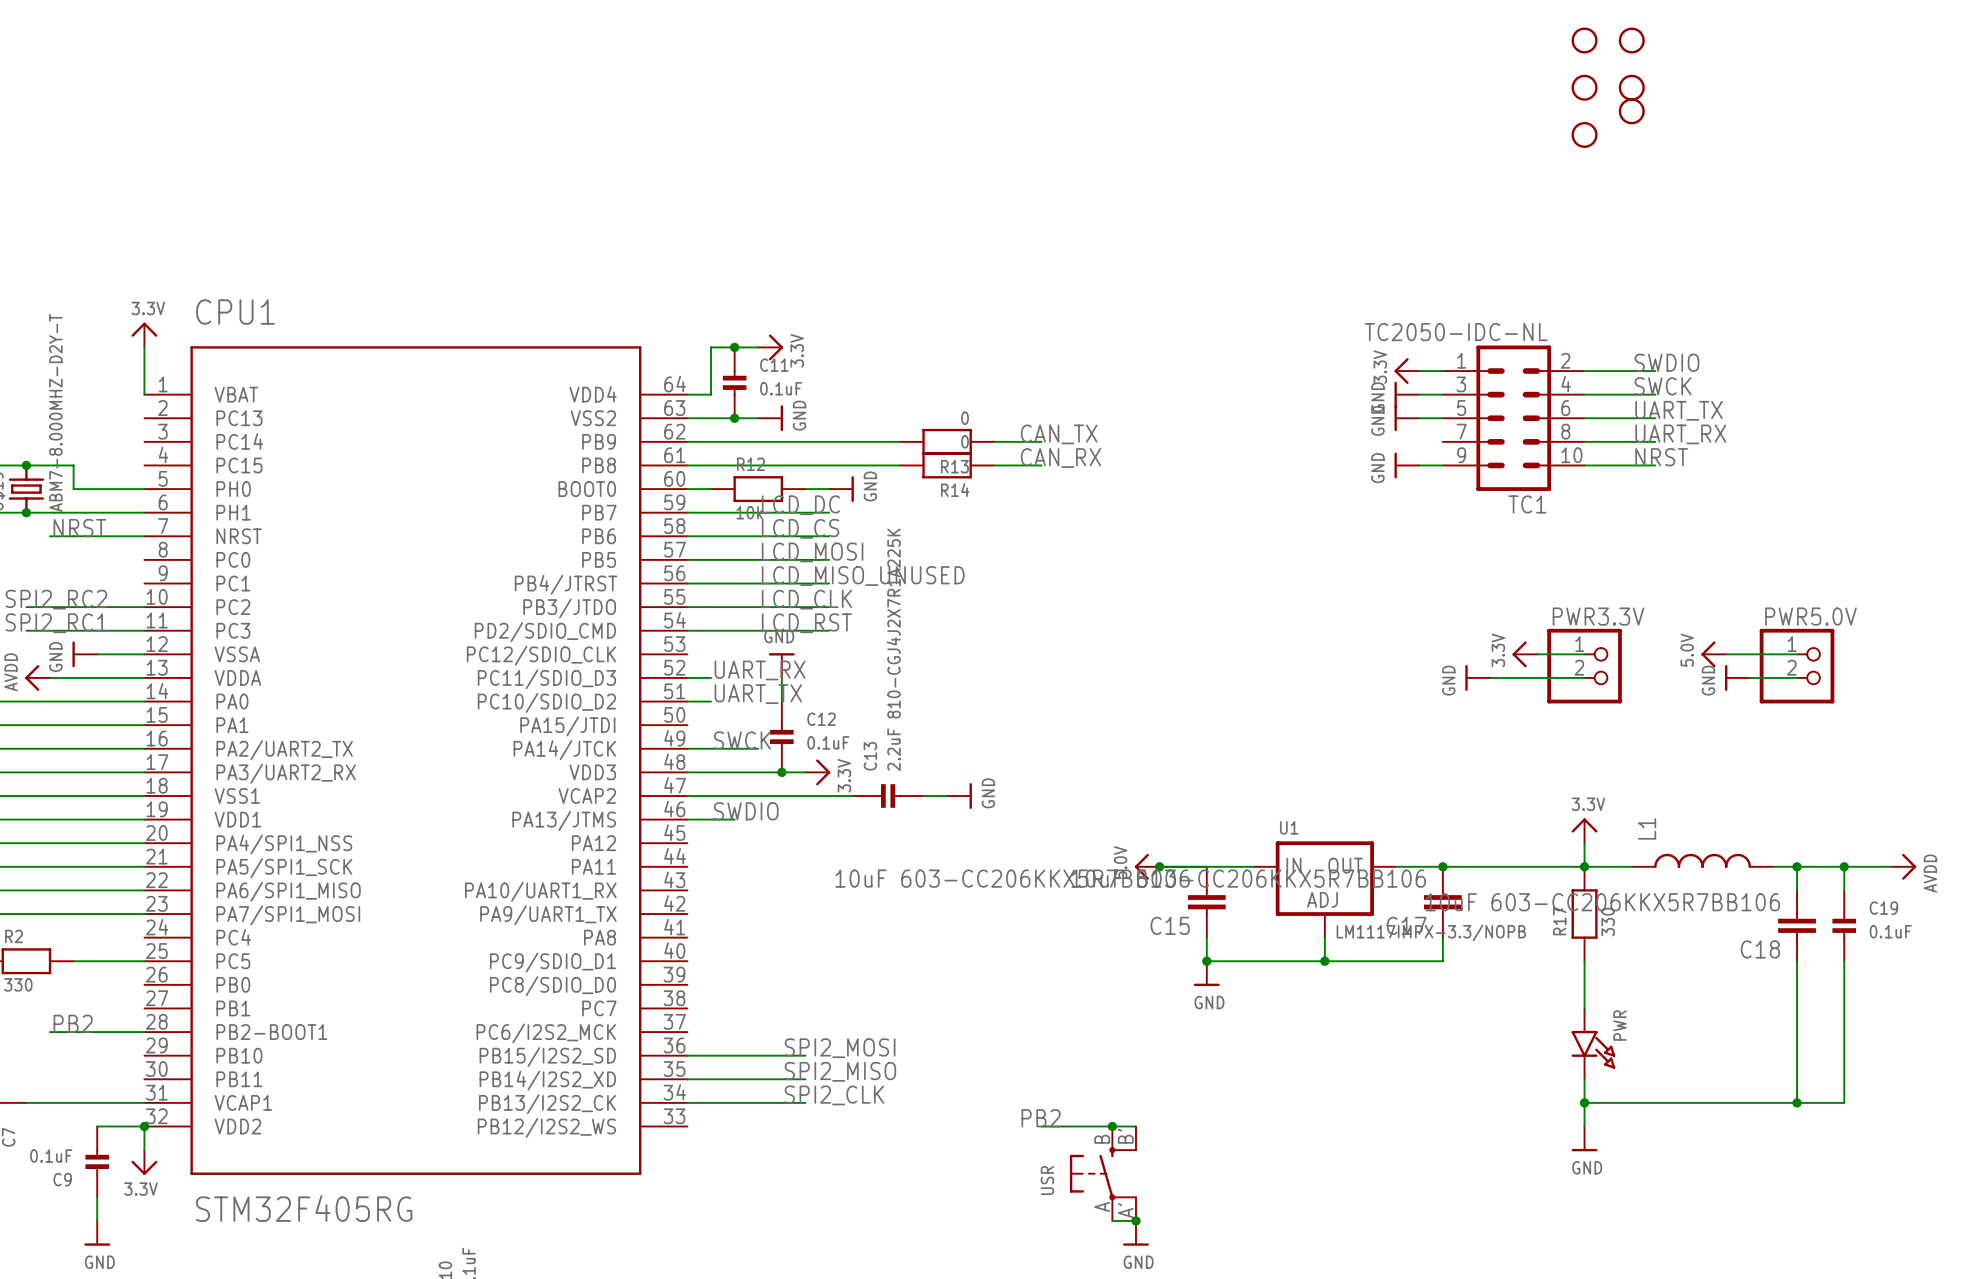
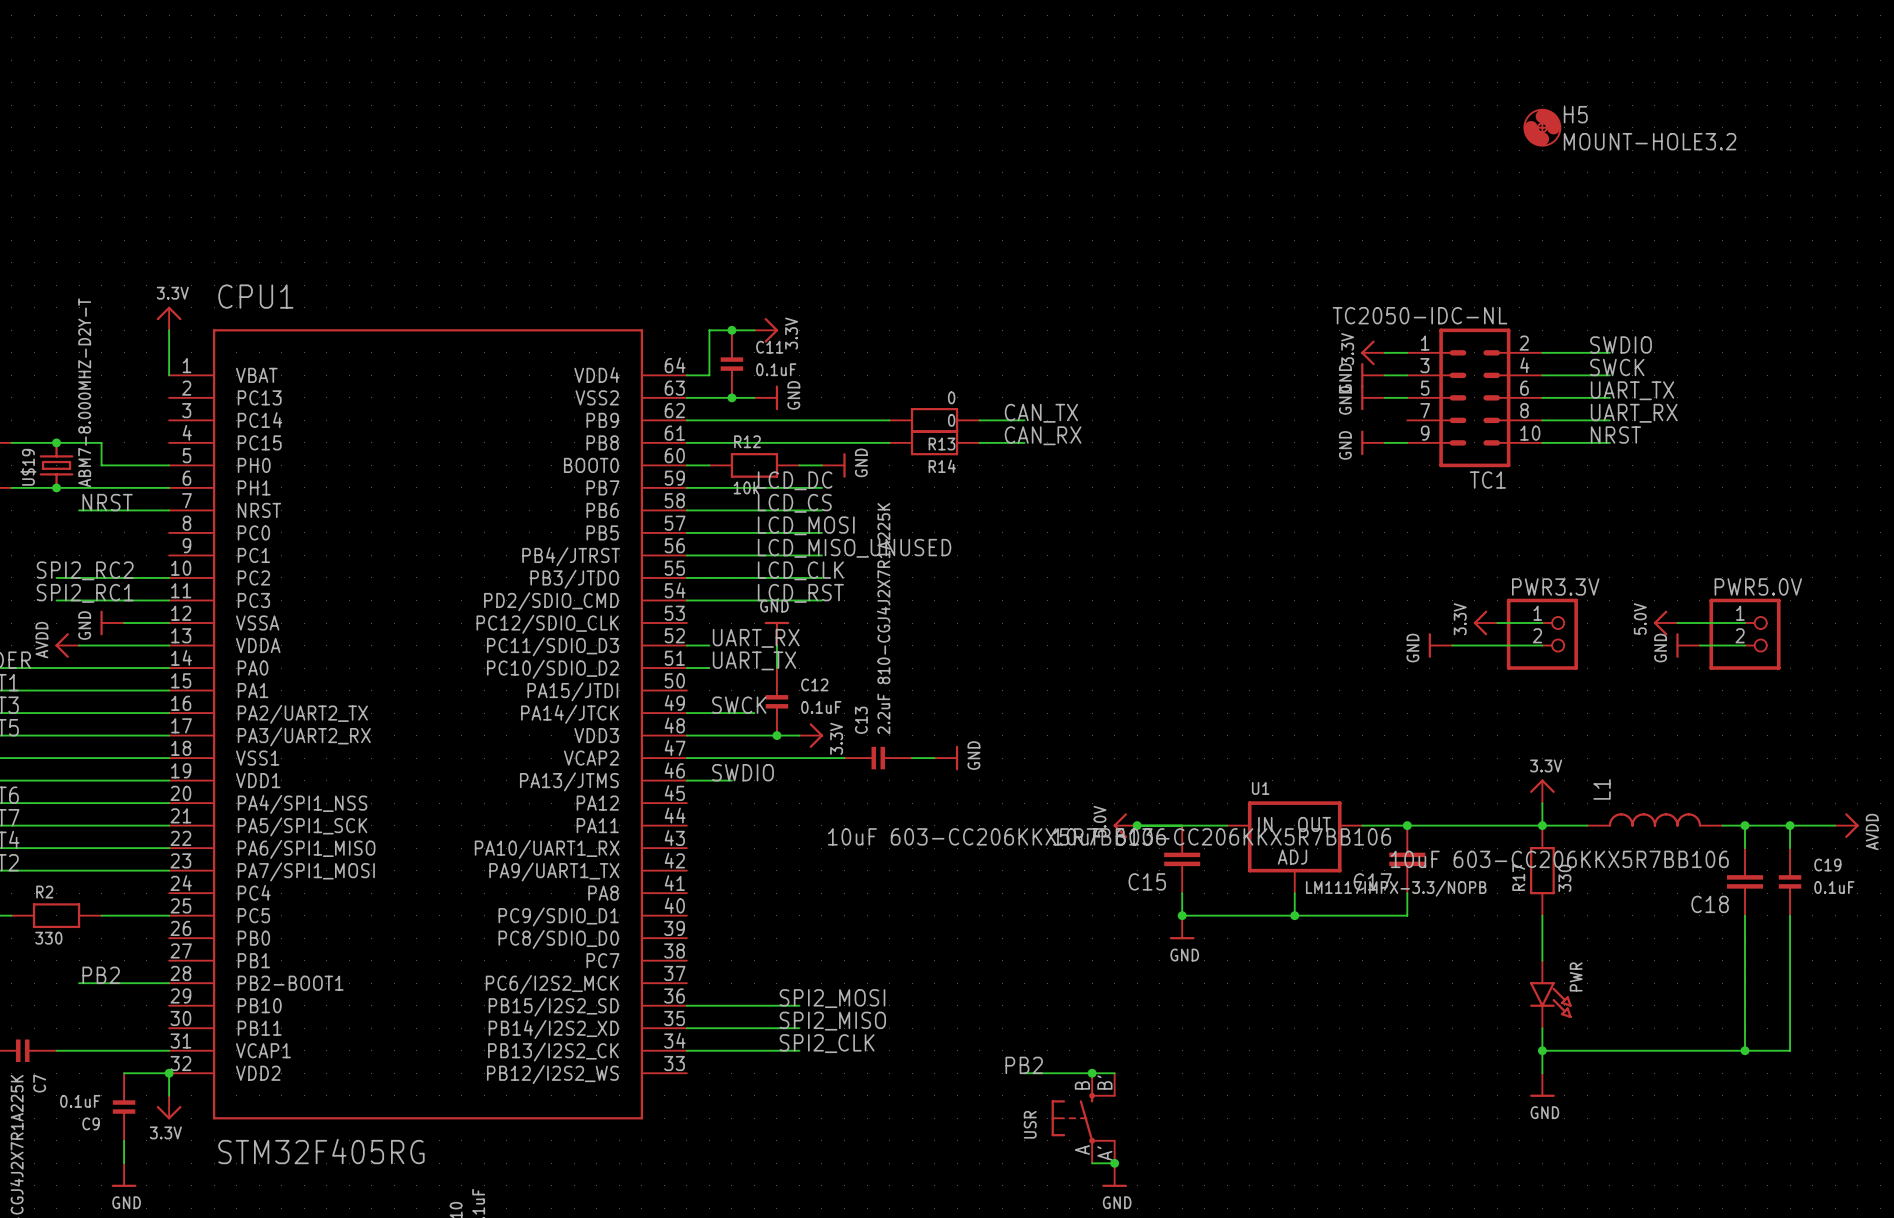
part: (1584, 40) -> none
part: (1631, 40) -> none
part: (1584, 87) -> none
part: (1631, 87) -> none
part: (1631, 111) -> none
part: (1584, 134) -> none
H5: none -> MOUNT-HOLE3.2 (1542, 127)

